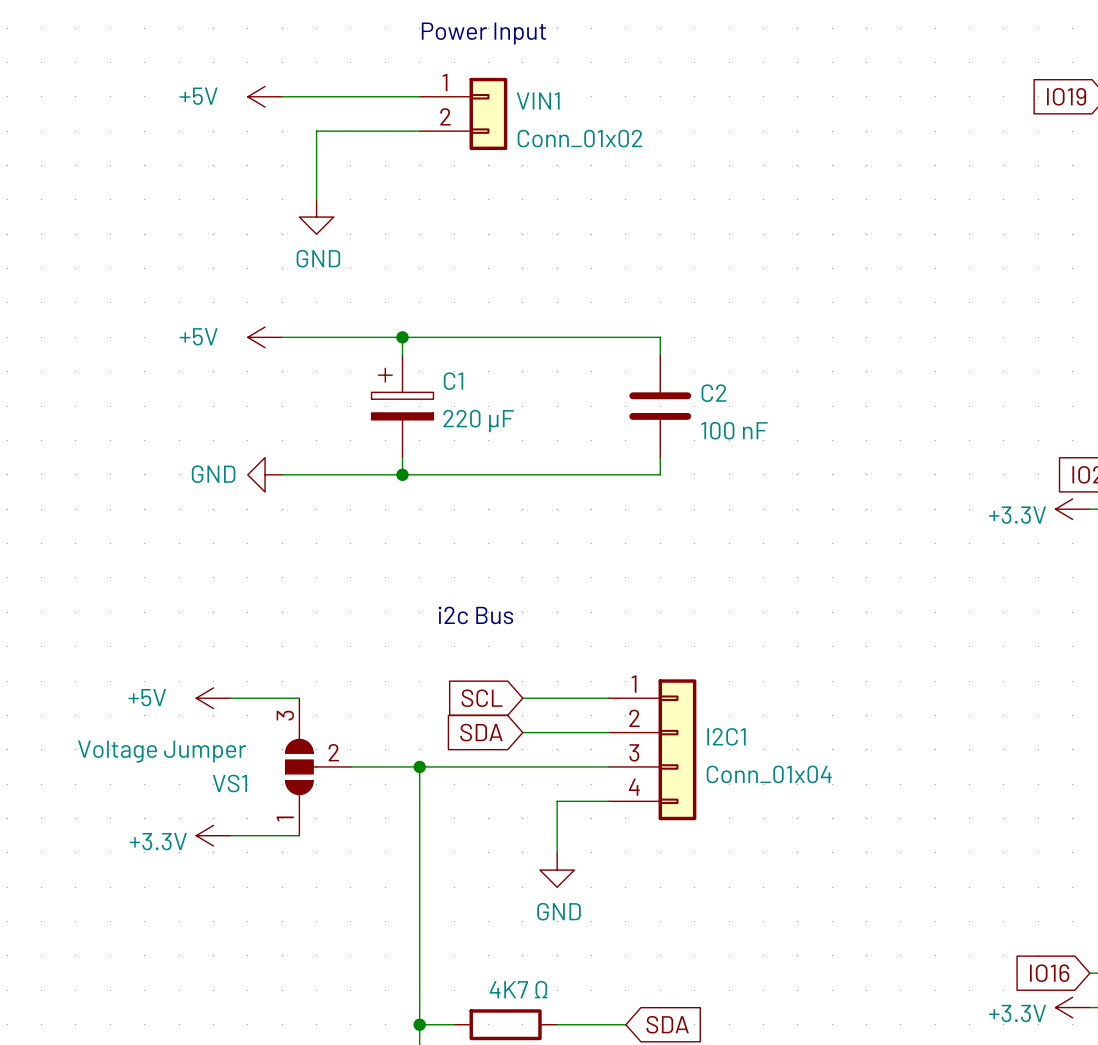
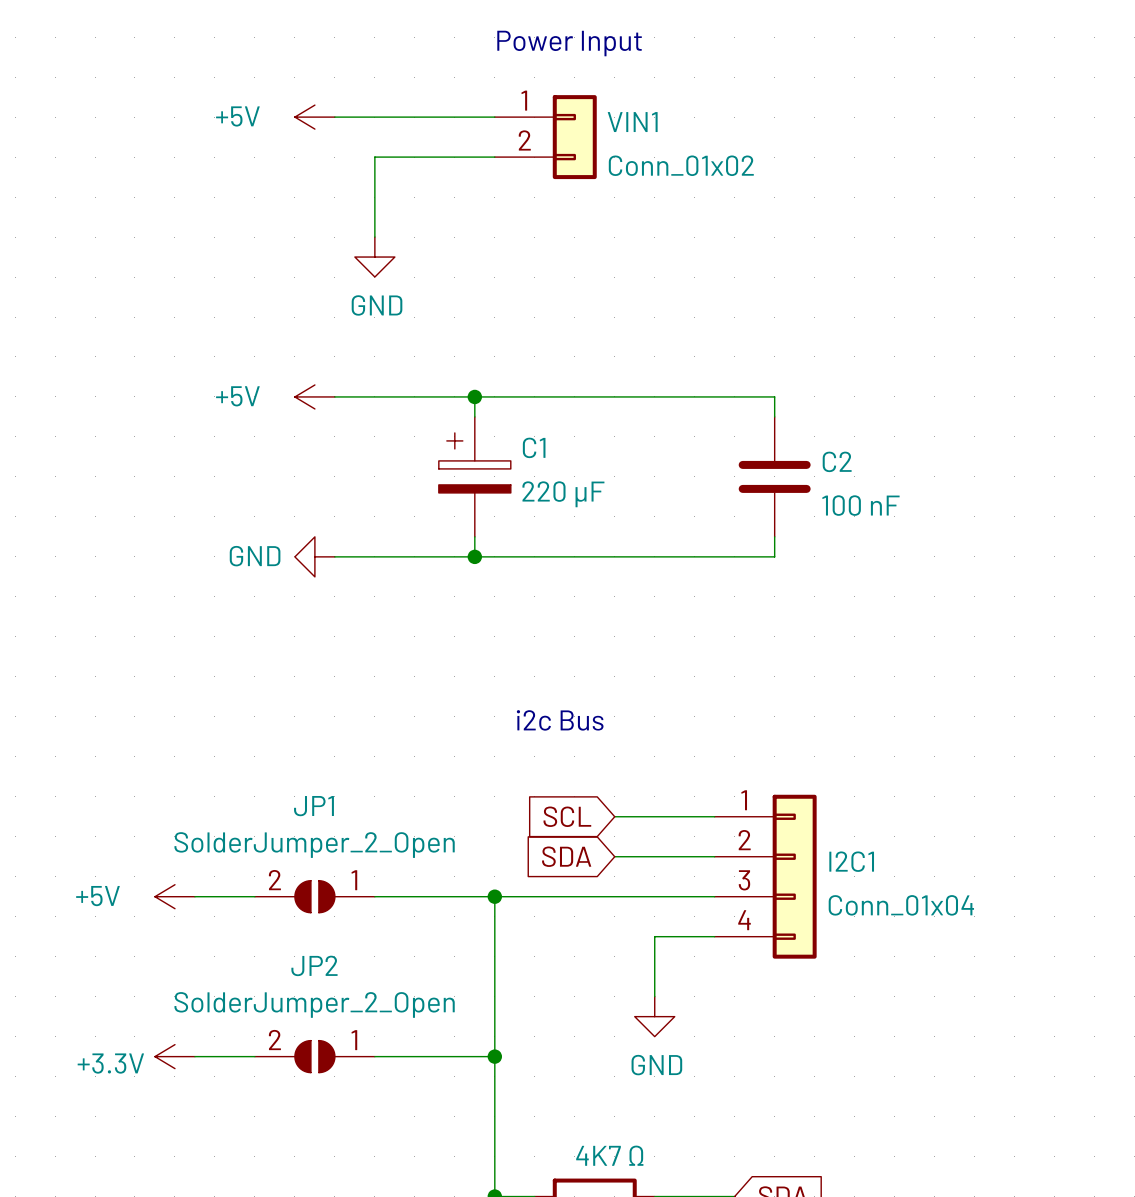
power symbol position: +5V (213, 698) -> +5V (174, 896)
wire: (230, 698) (299, 698) -> none
wire: none -> (194, 896) (254, 896)
JP1: none -> SolderJumper_2_Open (314, 896)
VS1: Voltage Jumper (318, 766) -> none
power symbol position: +3.3V (213, 835) -> +3.3V (174, 1056)
wire: (230, 835) (299, 835) -> none
wire: none -> (194, 1056) (254, 1056)
JP2: none -> SolderJumper_2_Open (314, 1056)
wire: none -> (374, 1056) (494, 1056)
junction: none -> (494, 1056)

